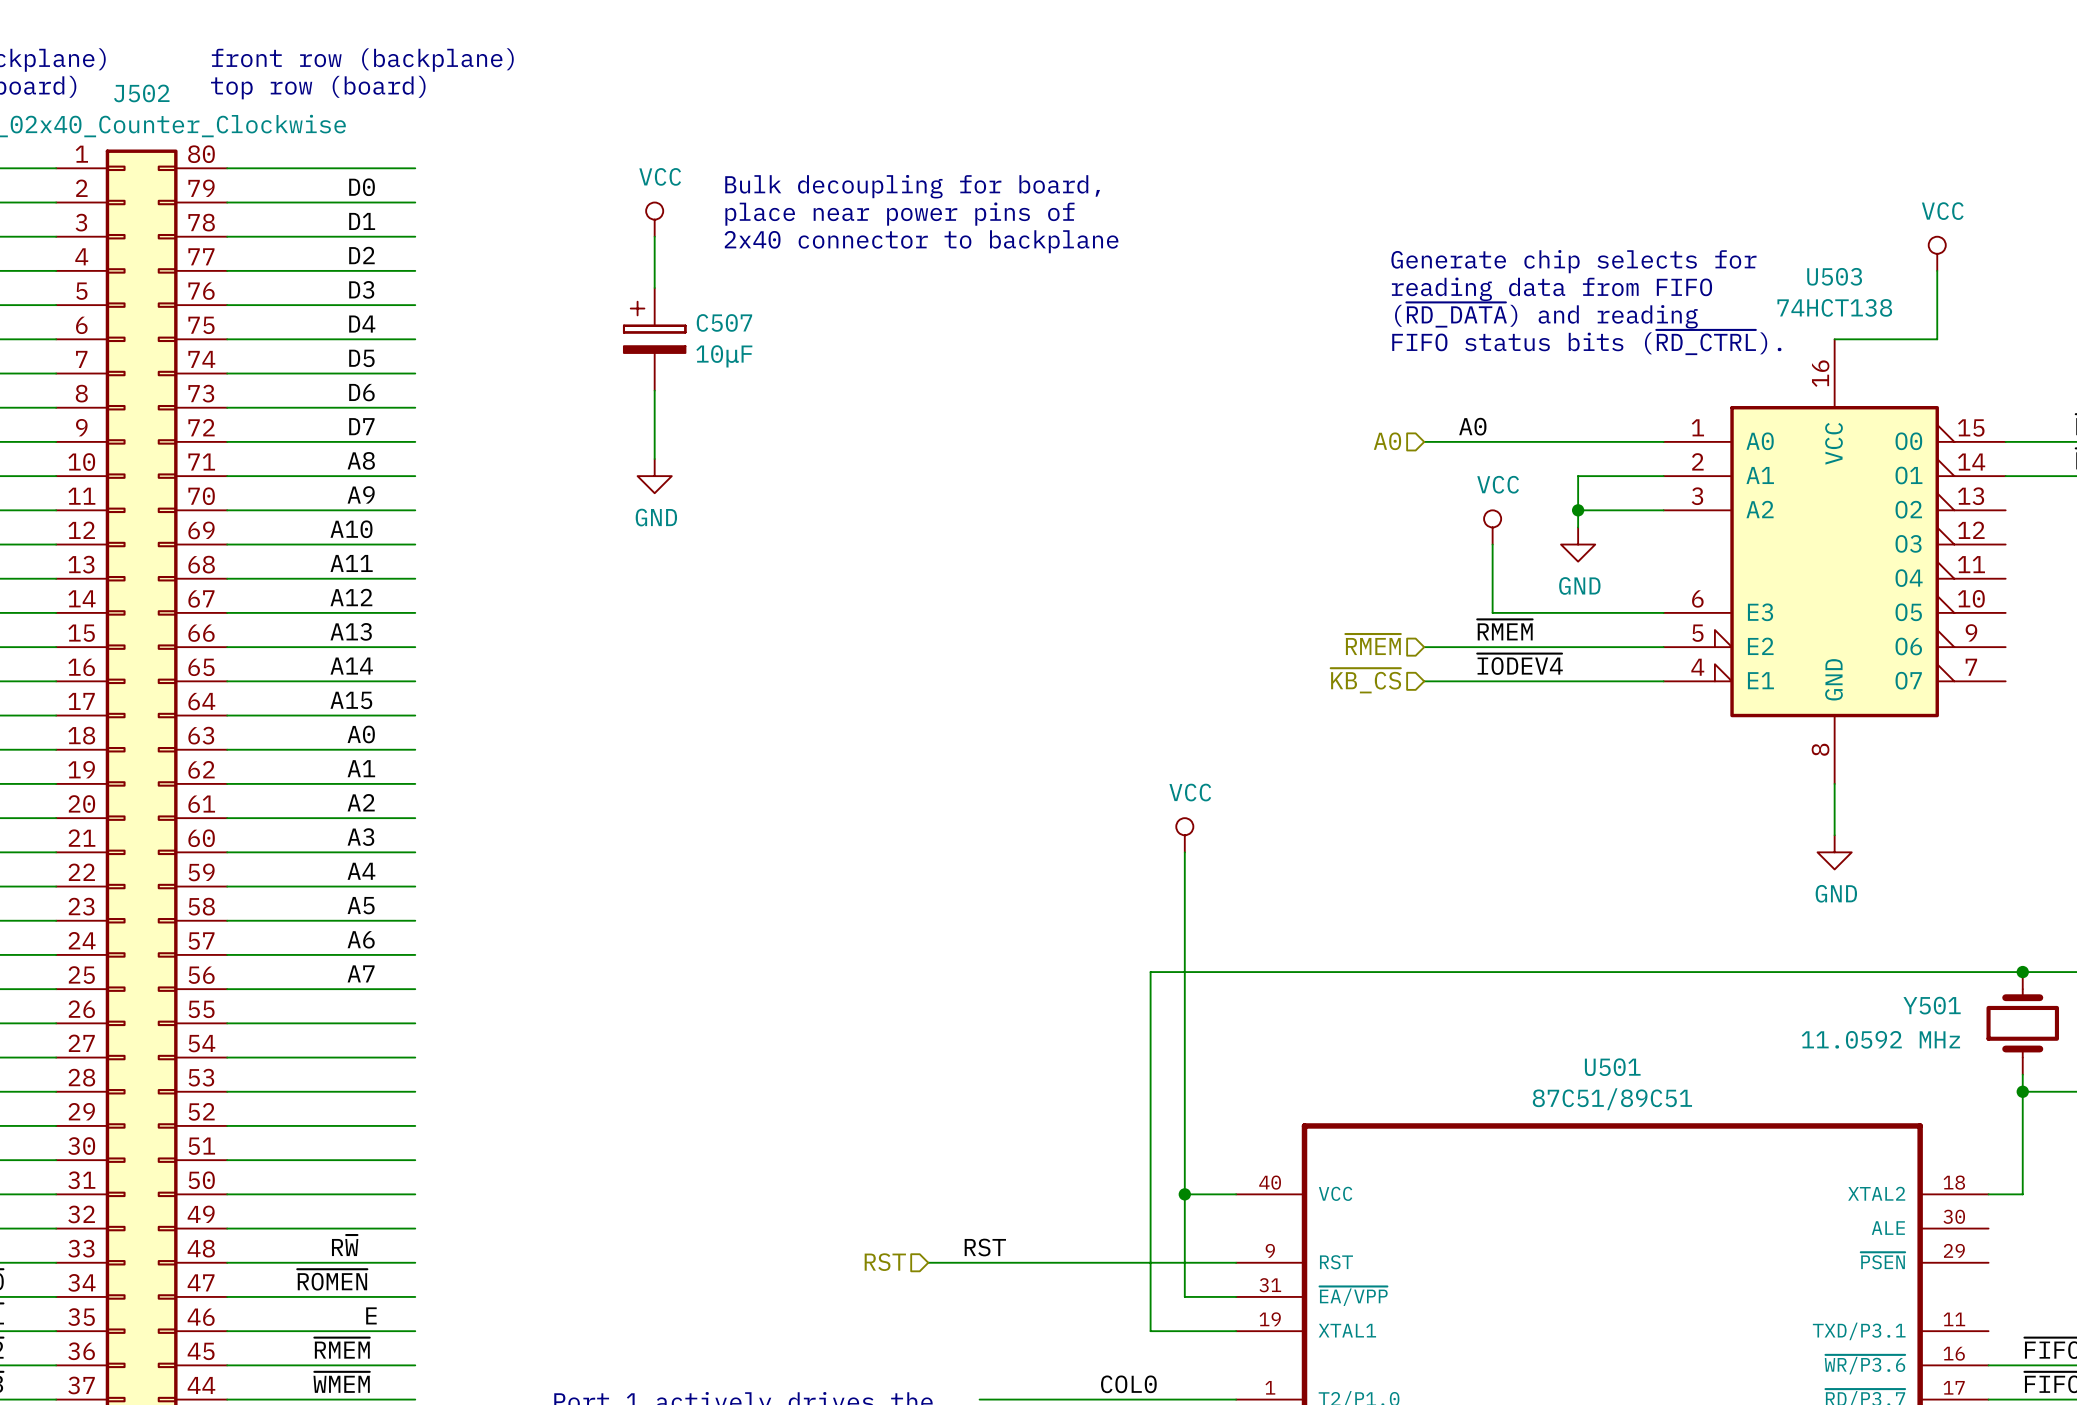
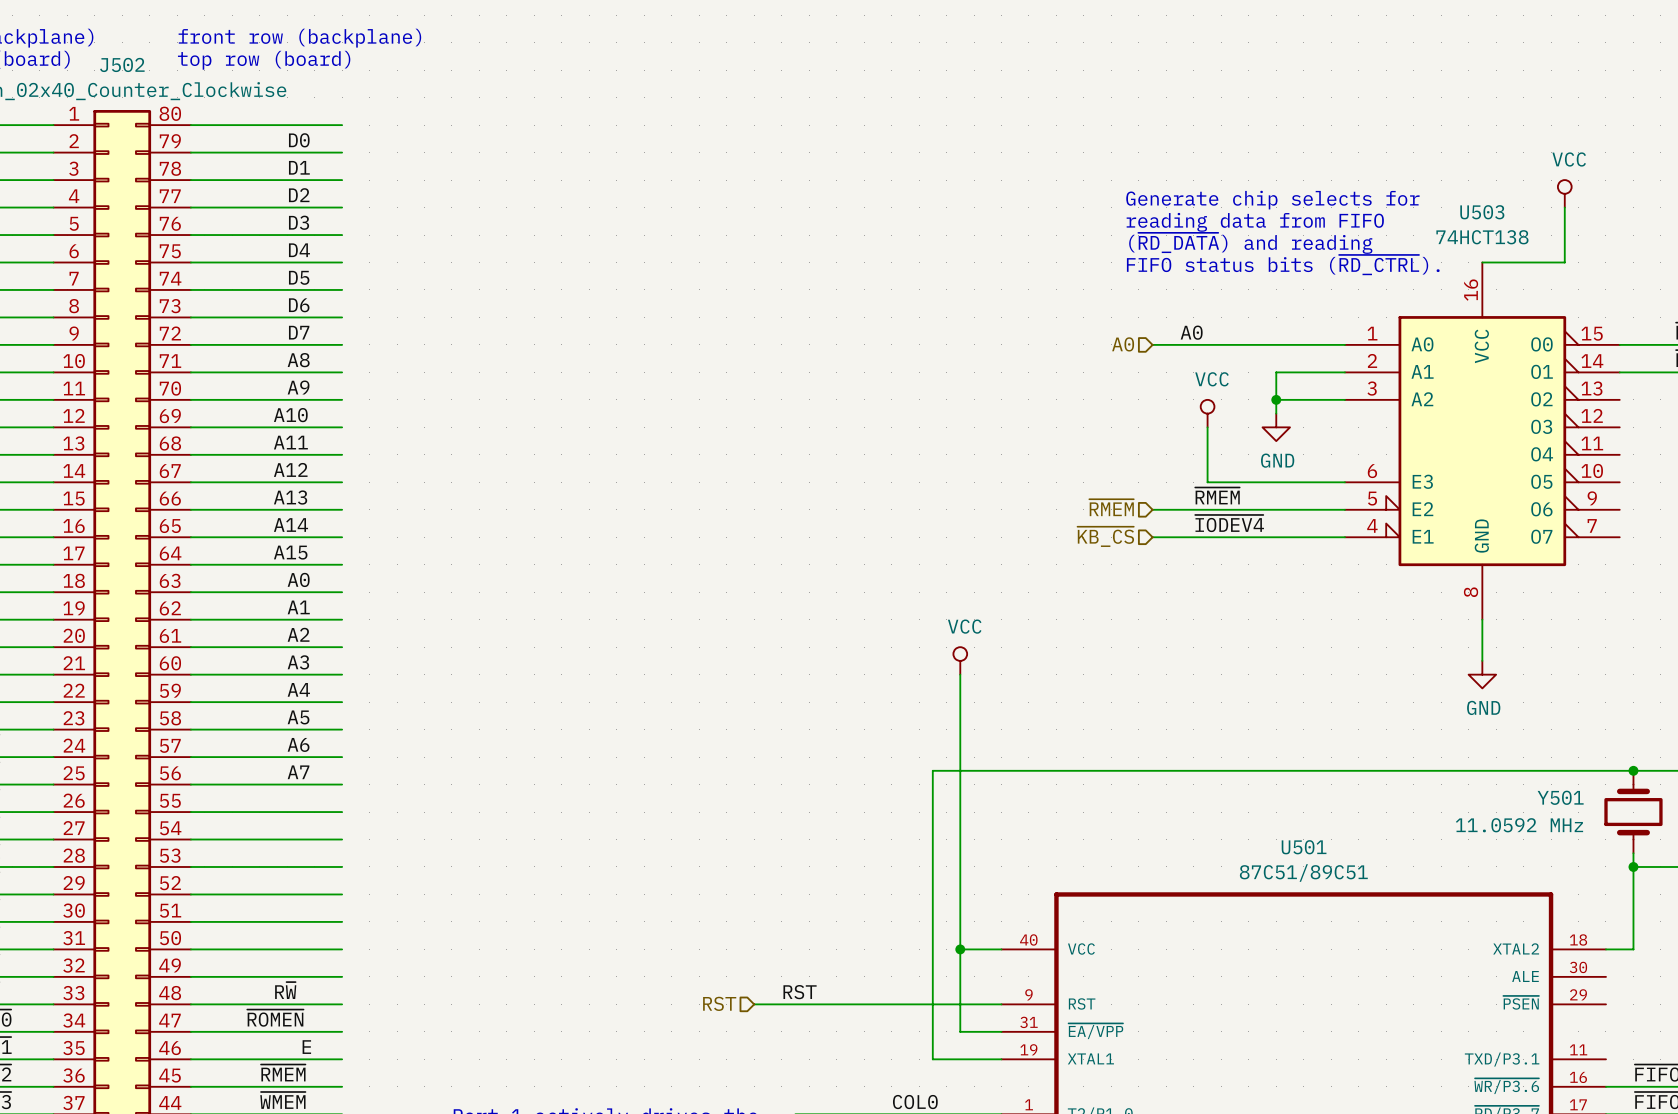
text: Bulk decoupling for board, (912, 186) -> none
text: place near power pins of (899, 214) -> none
power symbol: VCC (654, 219) -> none
wire: (654, 236) (654, 288) -> none
text: 2x40 connector to backplane (921, 241) -> none
C507: 10μF (654, 339) -> none
wire: (654, 390) (654, 459) -> none
power symbol: GND (654, 476) -> none

